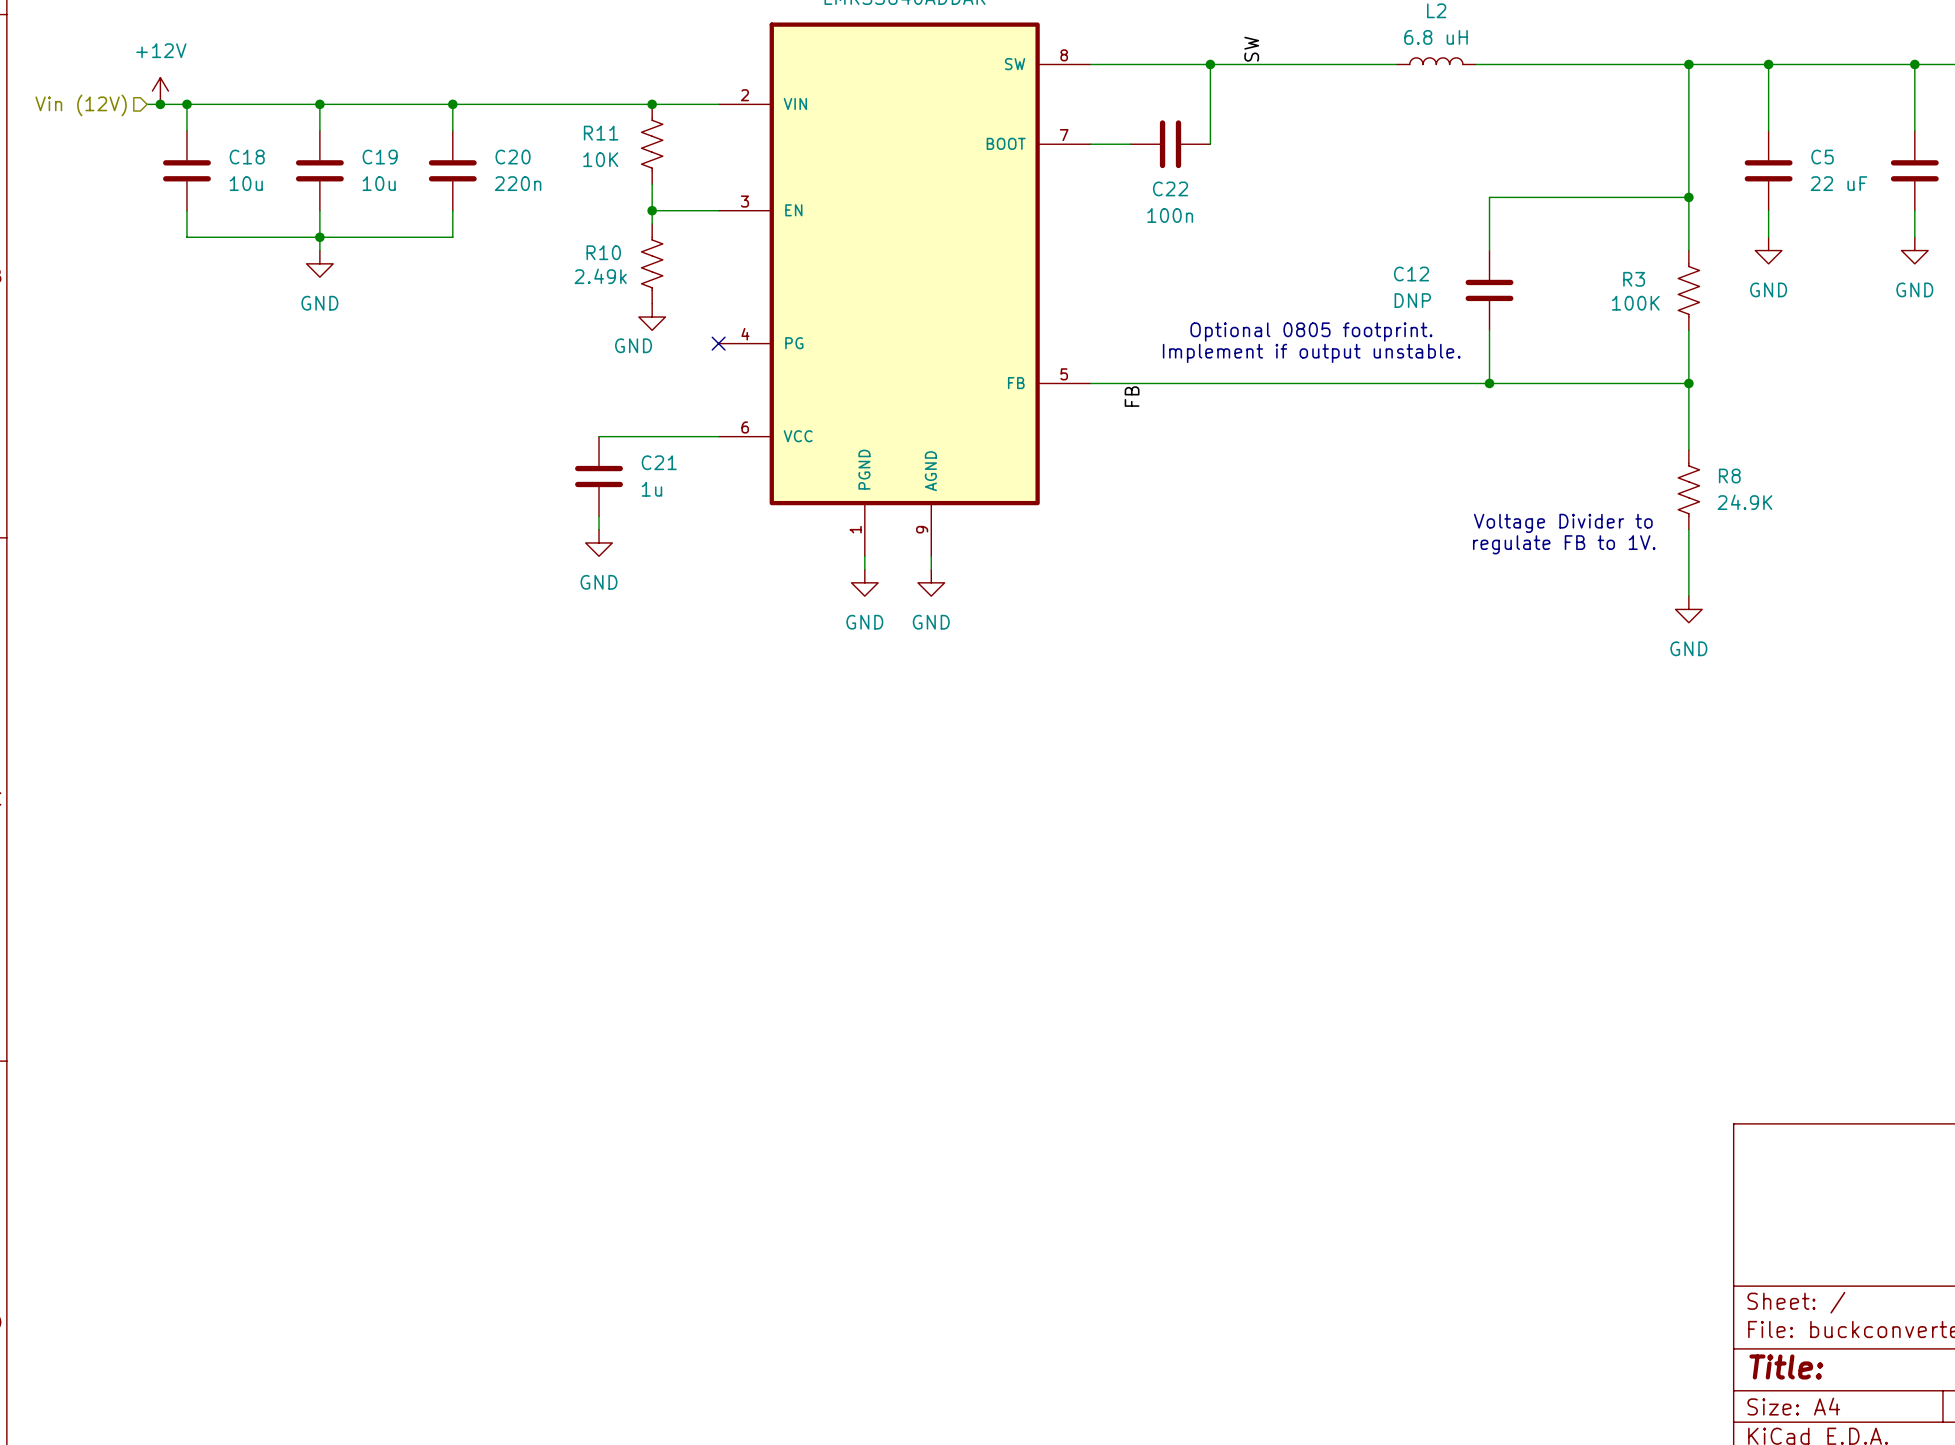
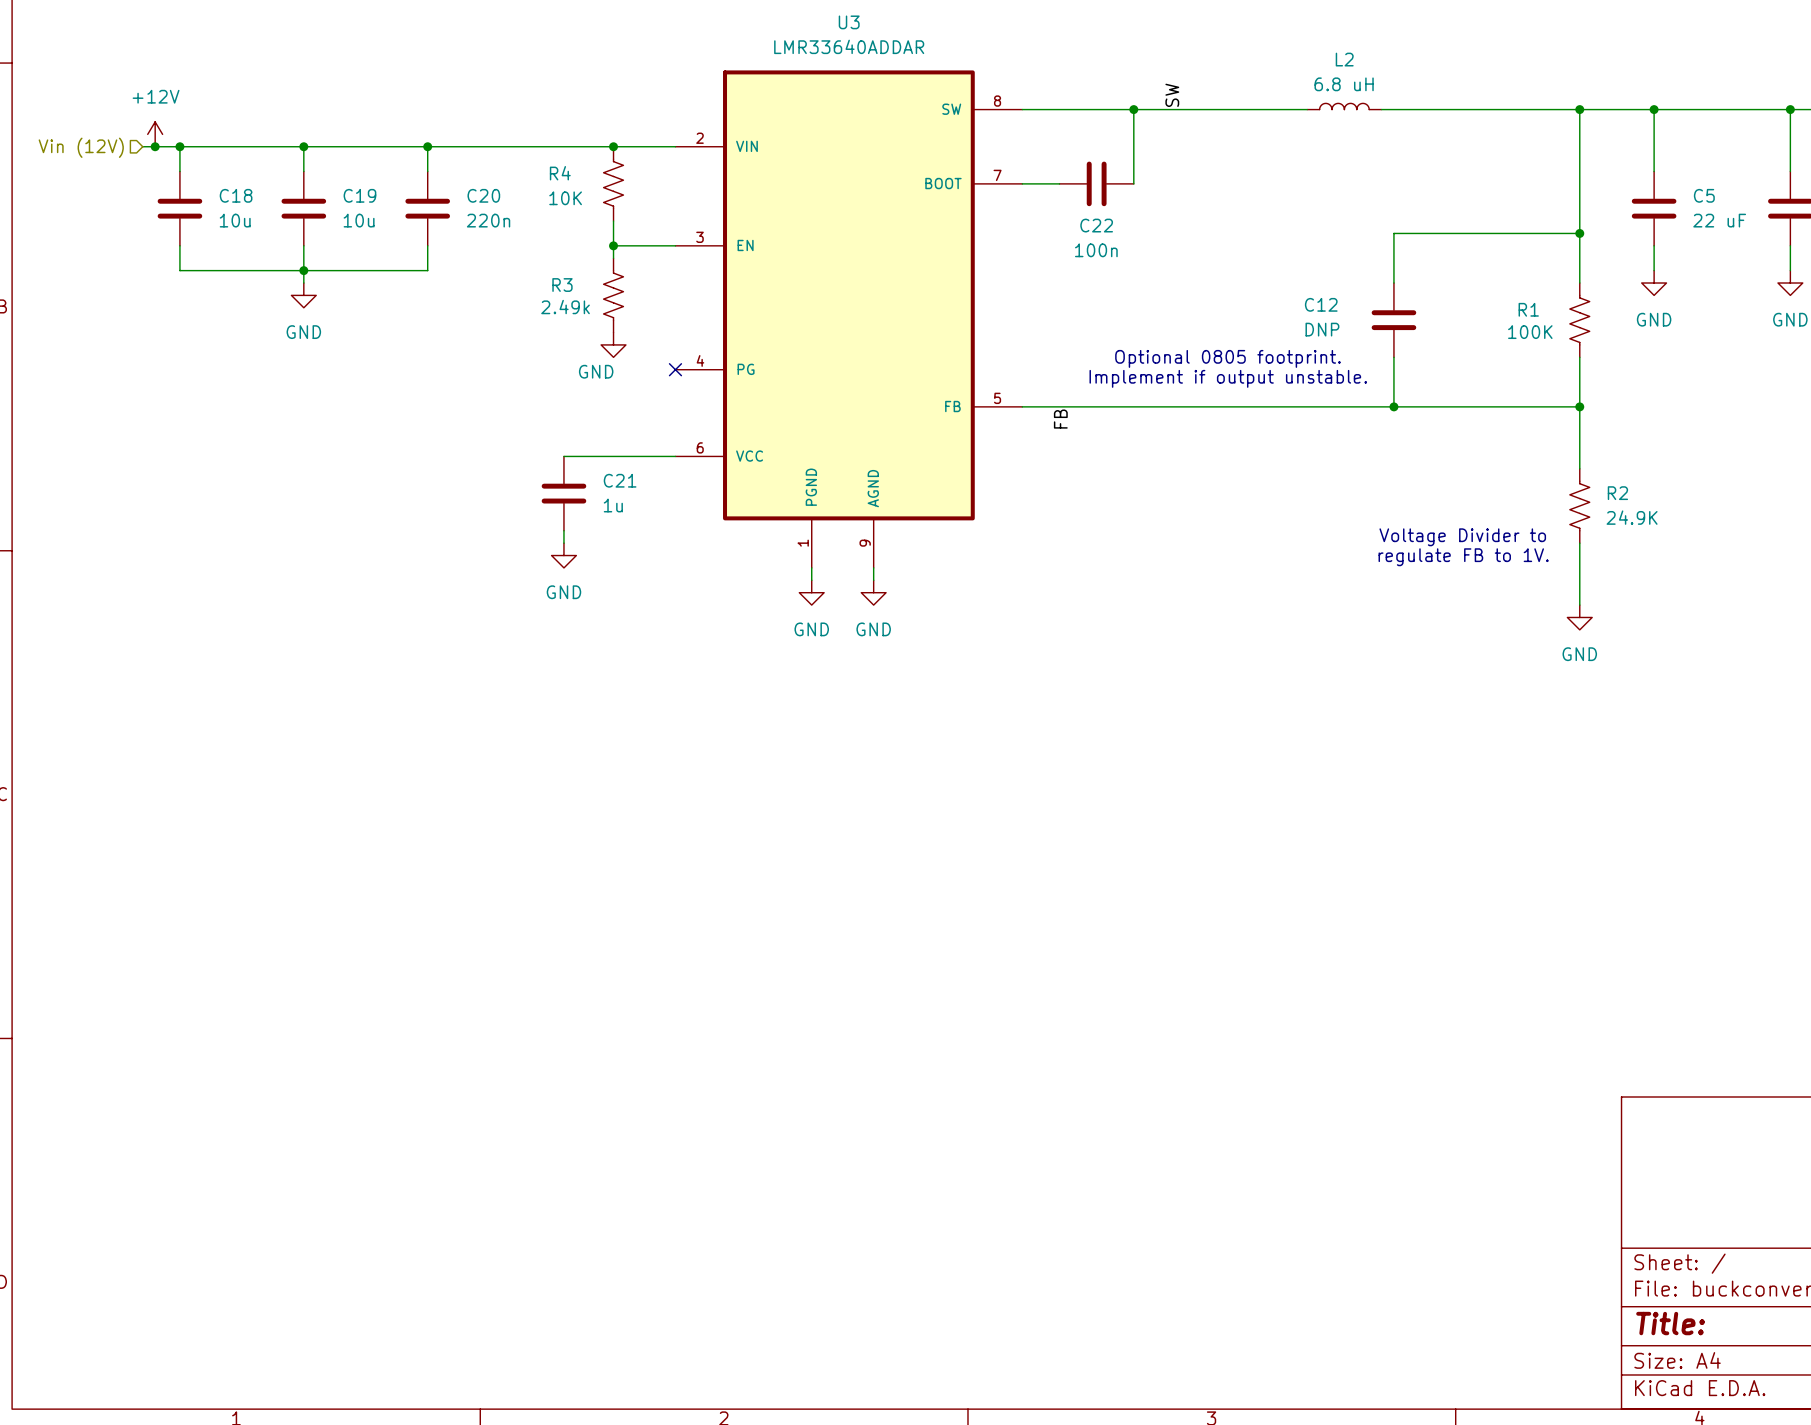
R11 name: R11 (601, 133) -> R4 (560, 173)
R10 name: R10 (603, 252) -> R3 (562, 285)
R3 name: R3 (1634, 279) -> R1 (1528, 309)
R8 name: R8 (1729, 476) -> R2 (1617, 493)

